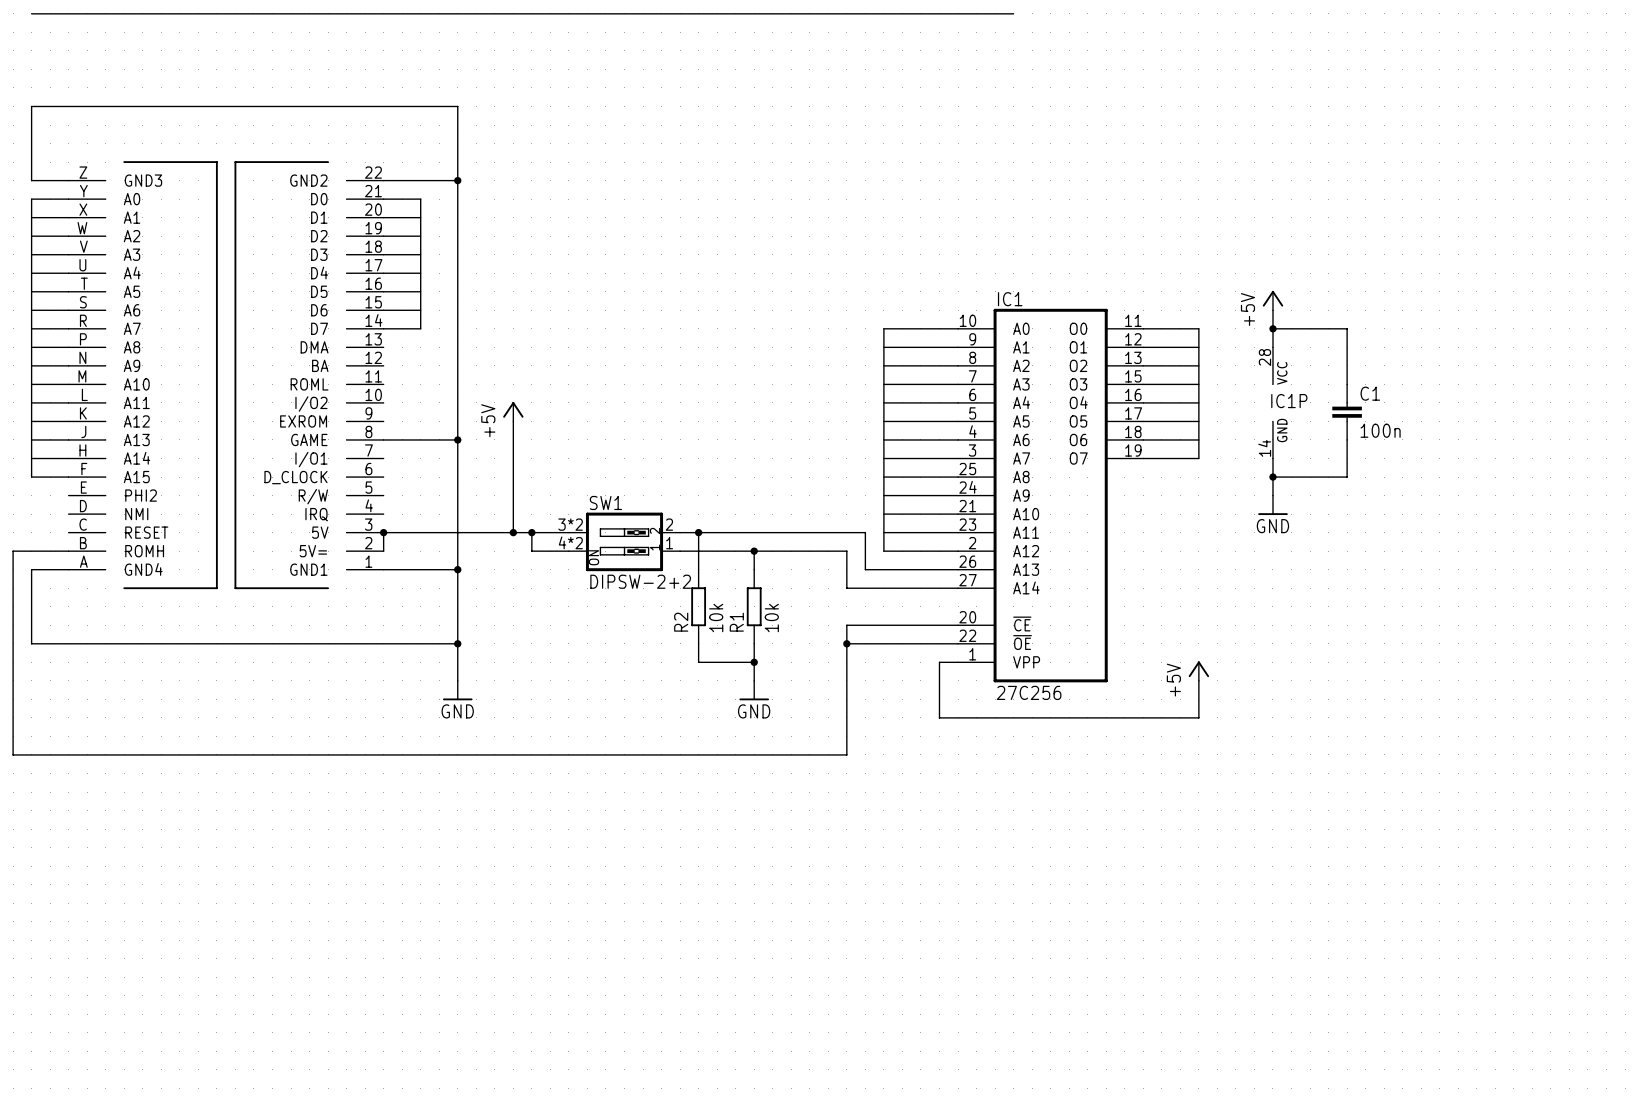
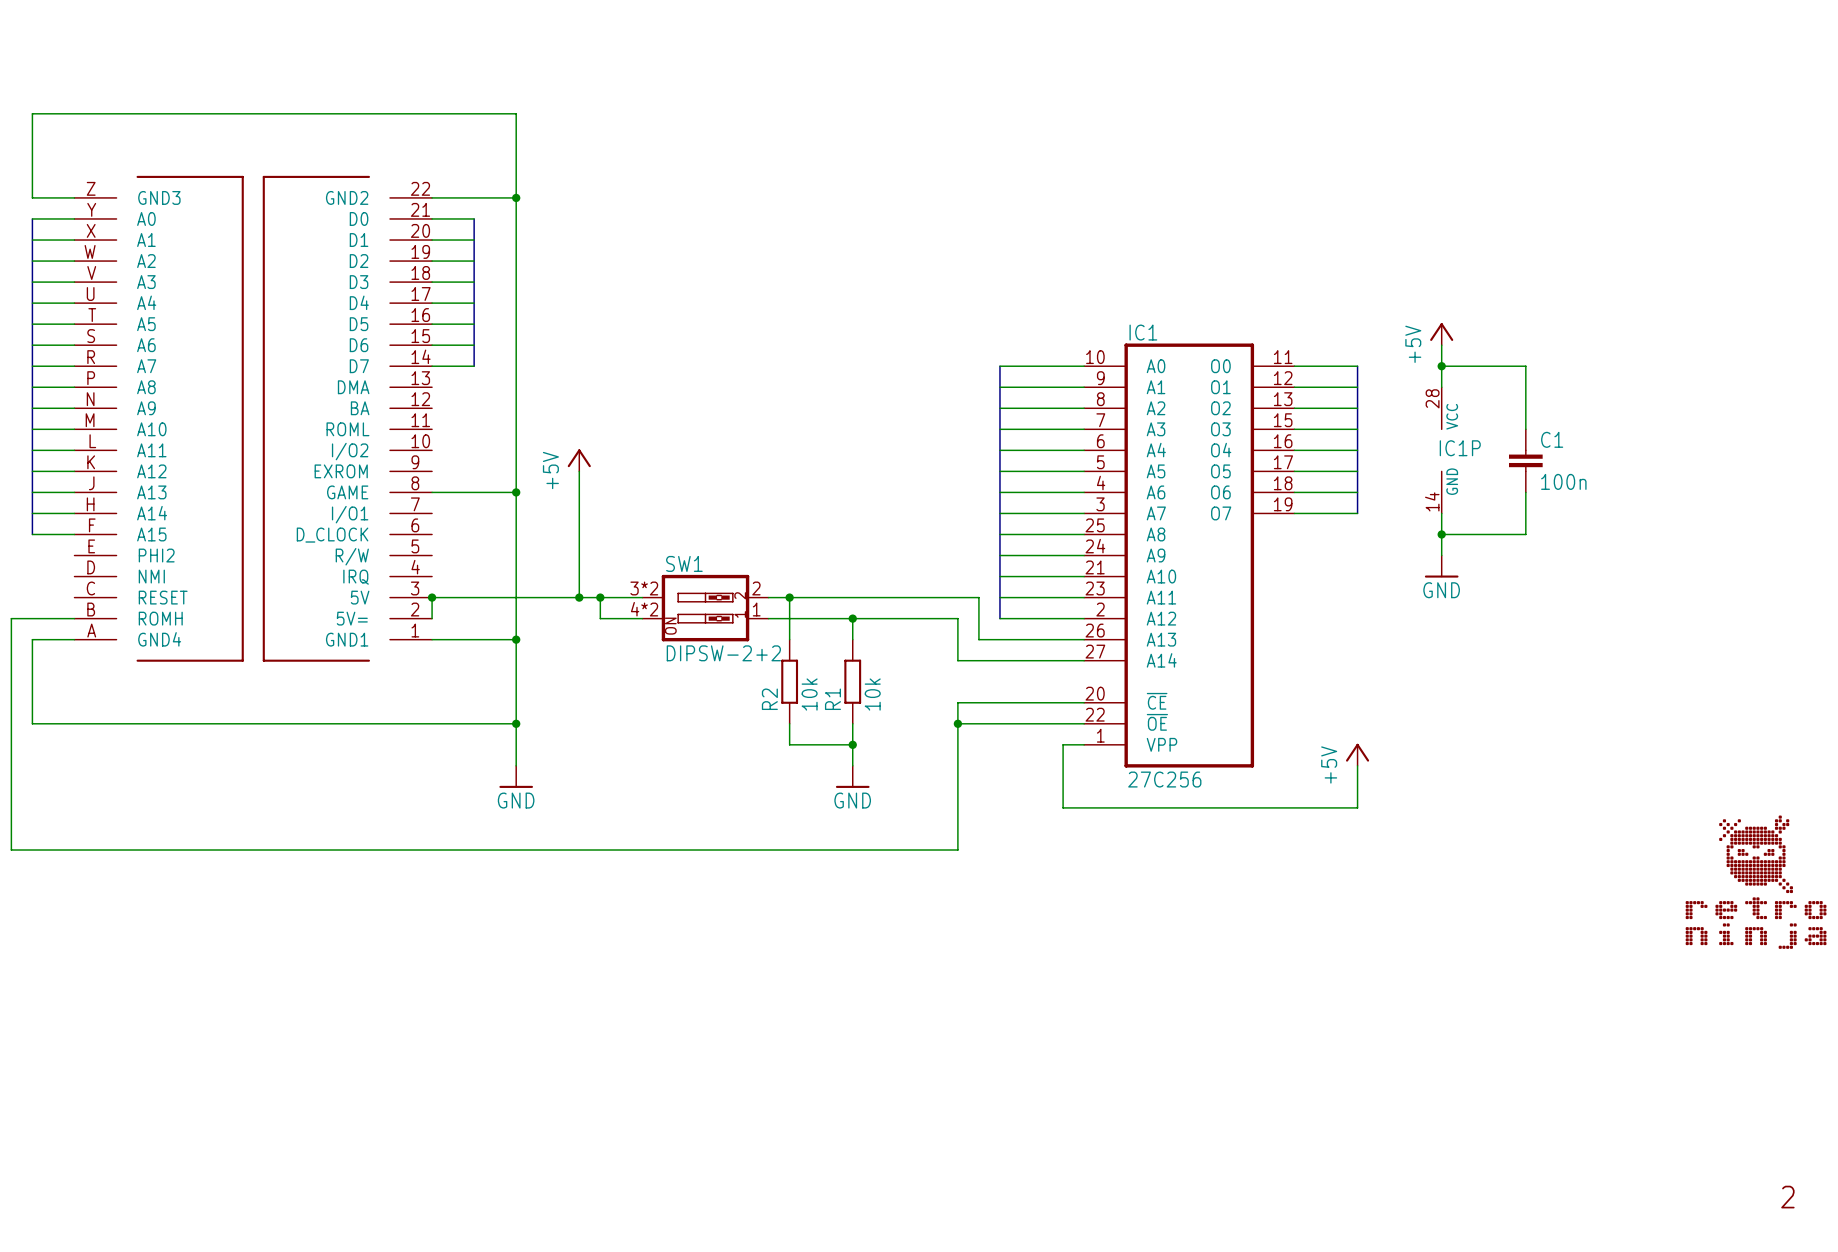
bus: (31, 13) (1013, 13) -> none
part: none -> (1756, 882)
text: none -> 2 (1787, 1197)

